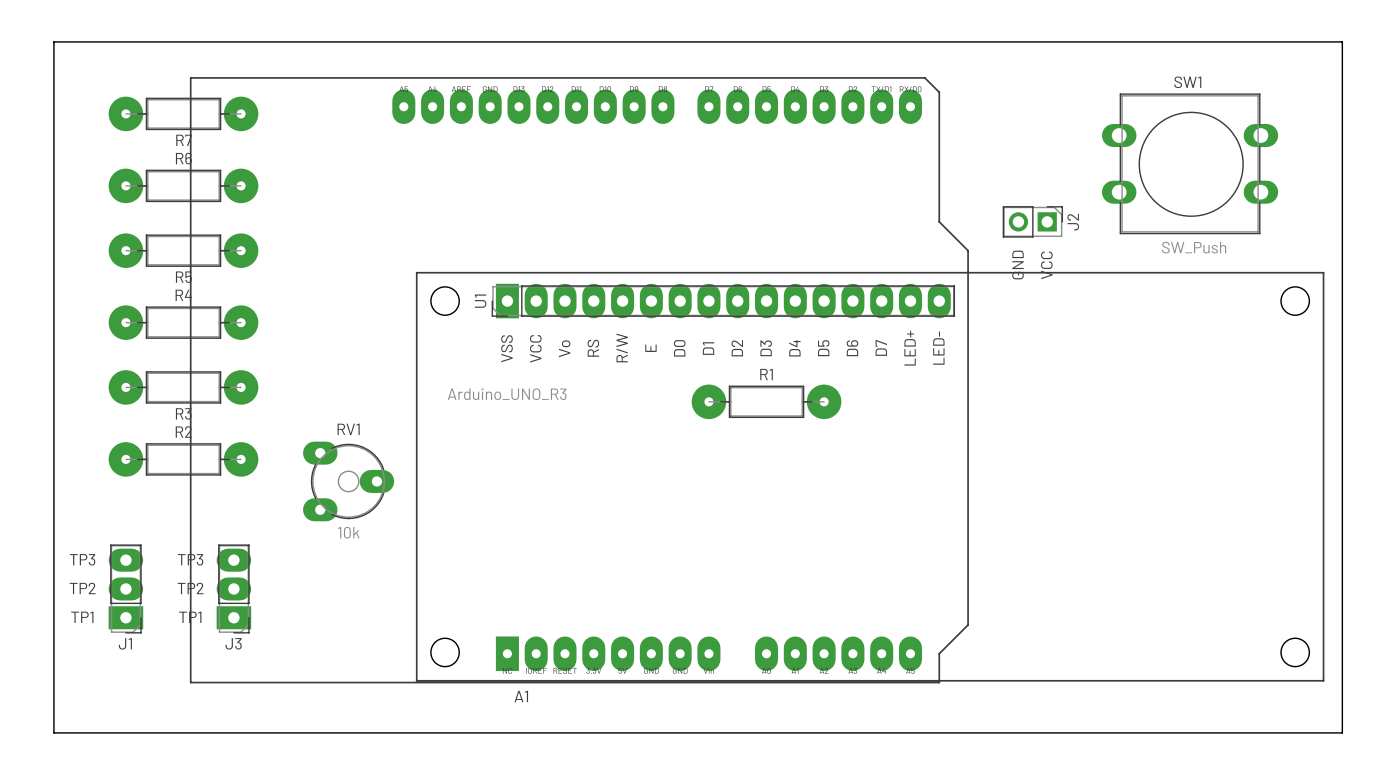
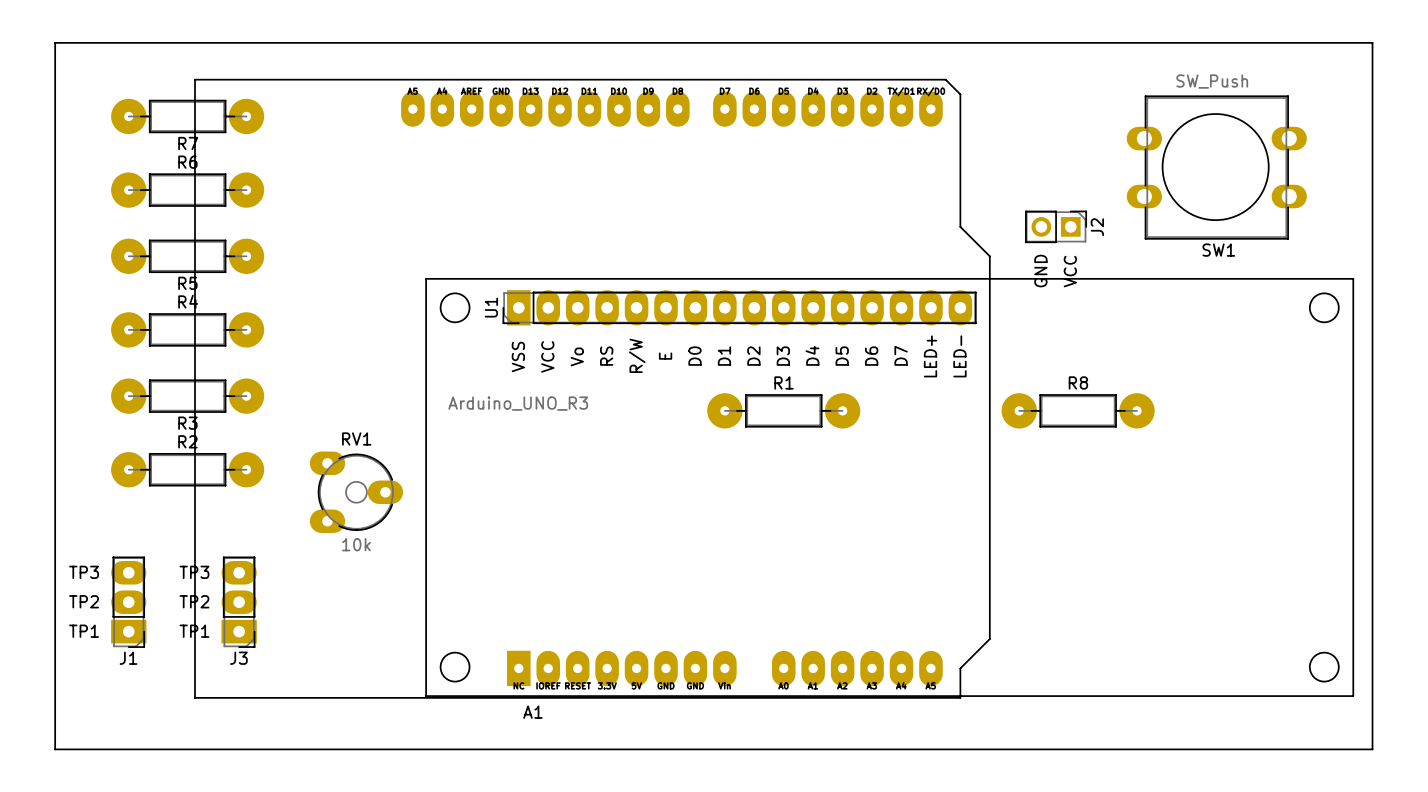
SW1 rotation: 0° (1190, 163) -> 180° (1216, 167)
R8: none -> (1078, 410)

